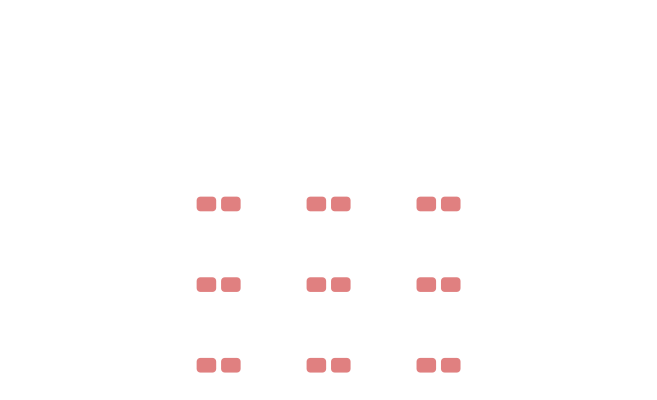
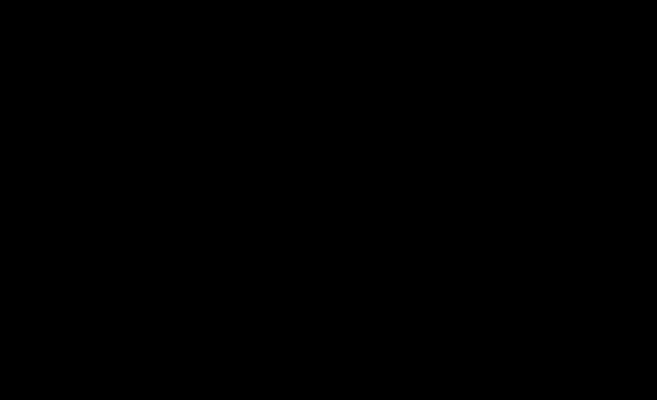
part: (218, 203) -> none
part: (328, 203) -> none
part: (438, 203) -> none
part: (218, 284) -> none
part: (328, 284) -> none
part: (438, 284) -> none
part: (218, 365) -> none
part: (328, 365) -> none
part: (438, 365) -> none

